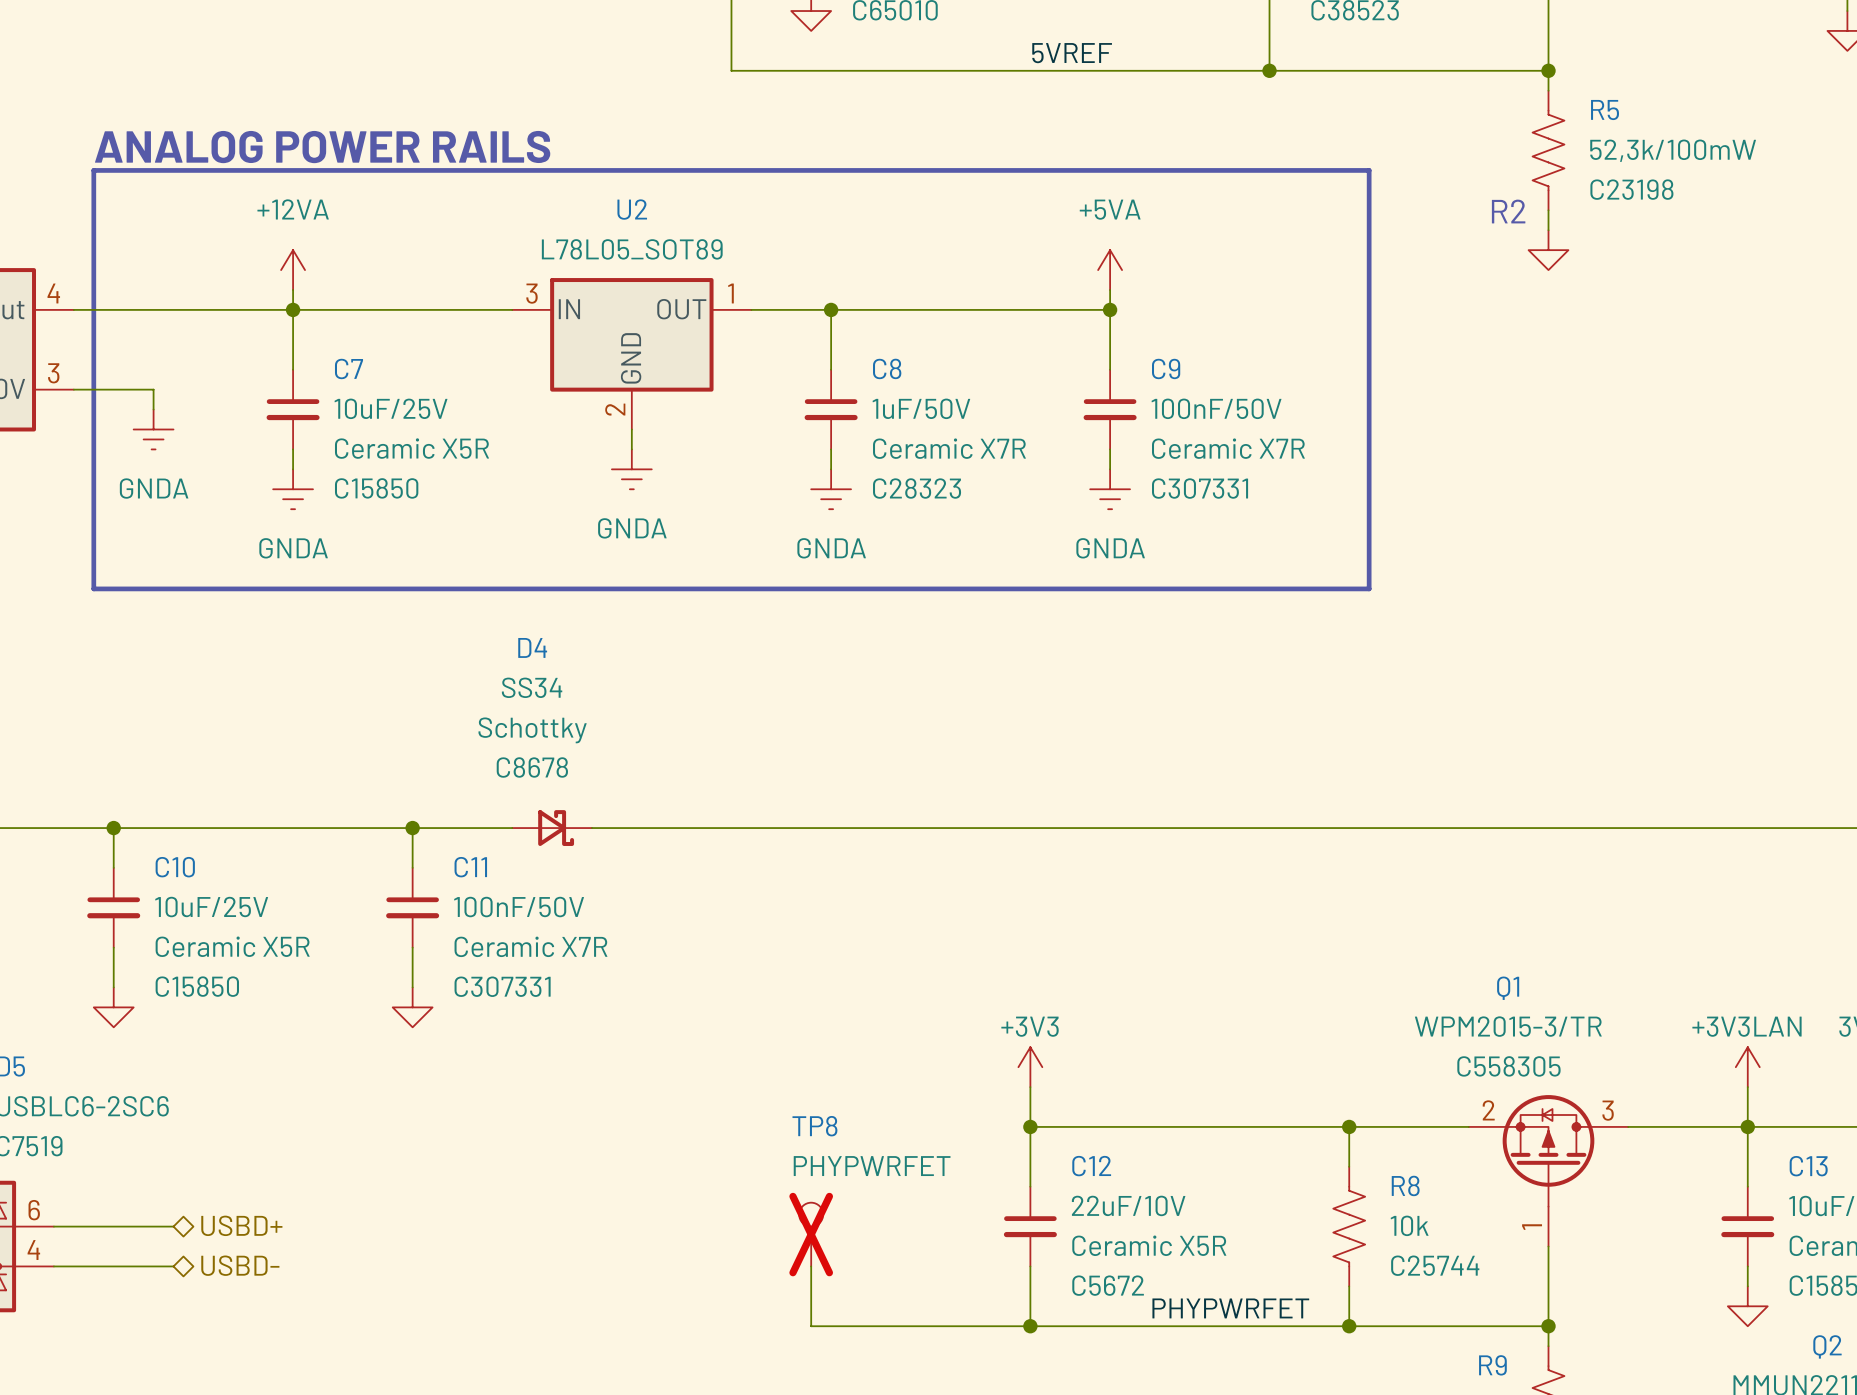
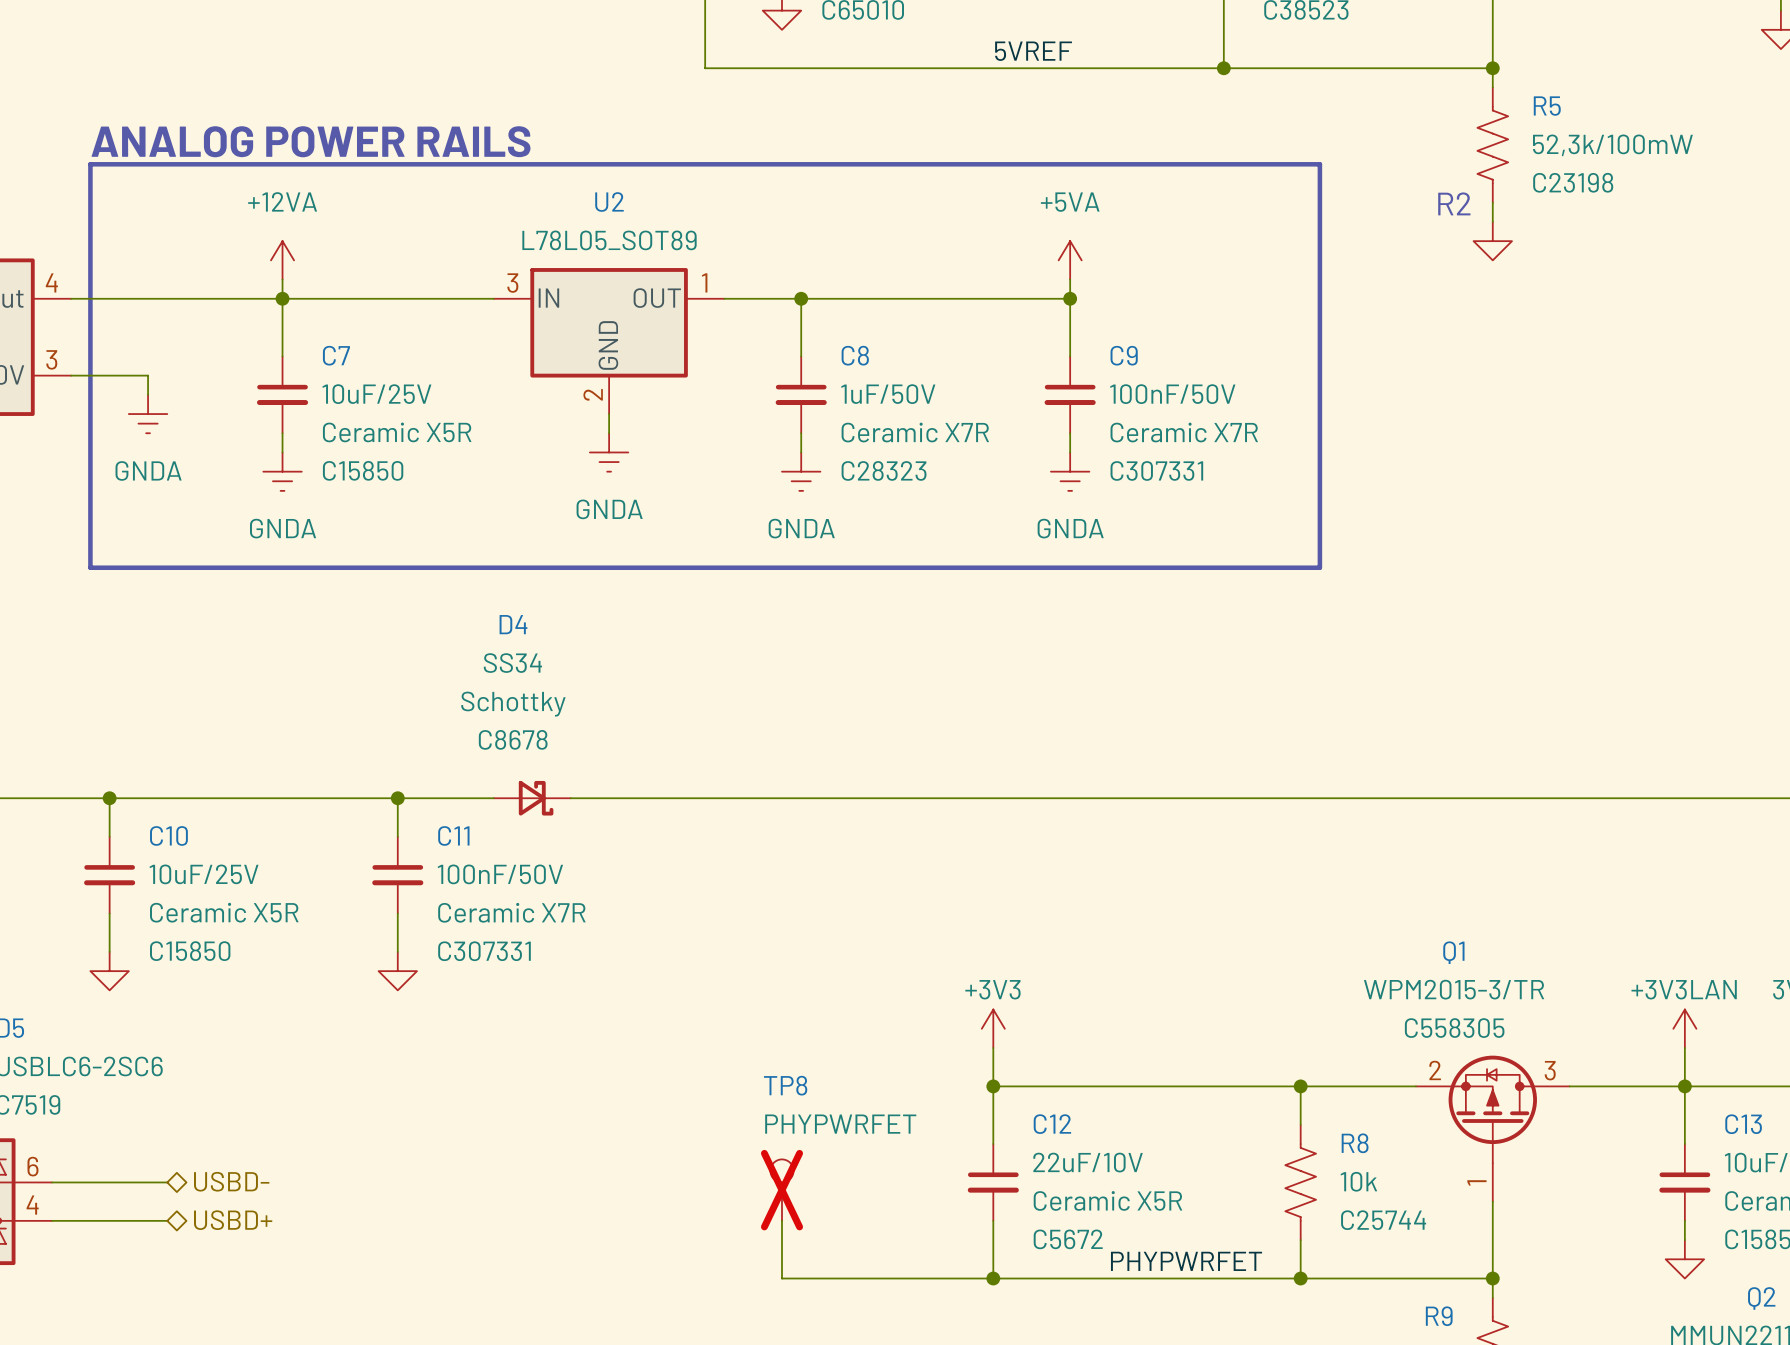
hierarchical label: USBD+ (241, 1225) -> USBD- (231, 1181)
hierarchical label: USBD- (240, 1265) -> USBD+ (233, 1220)

